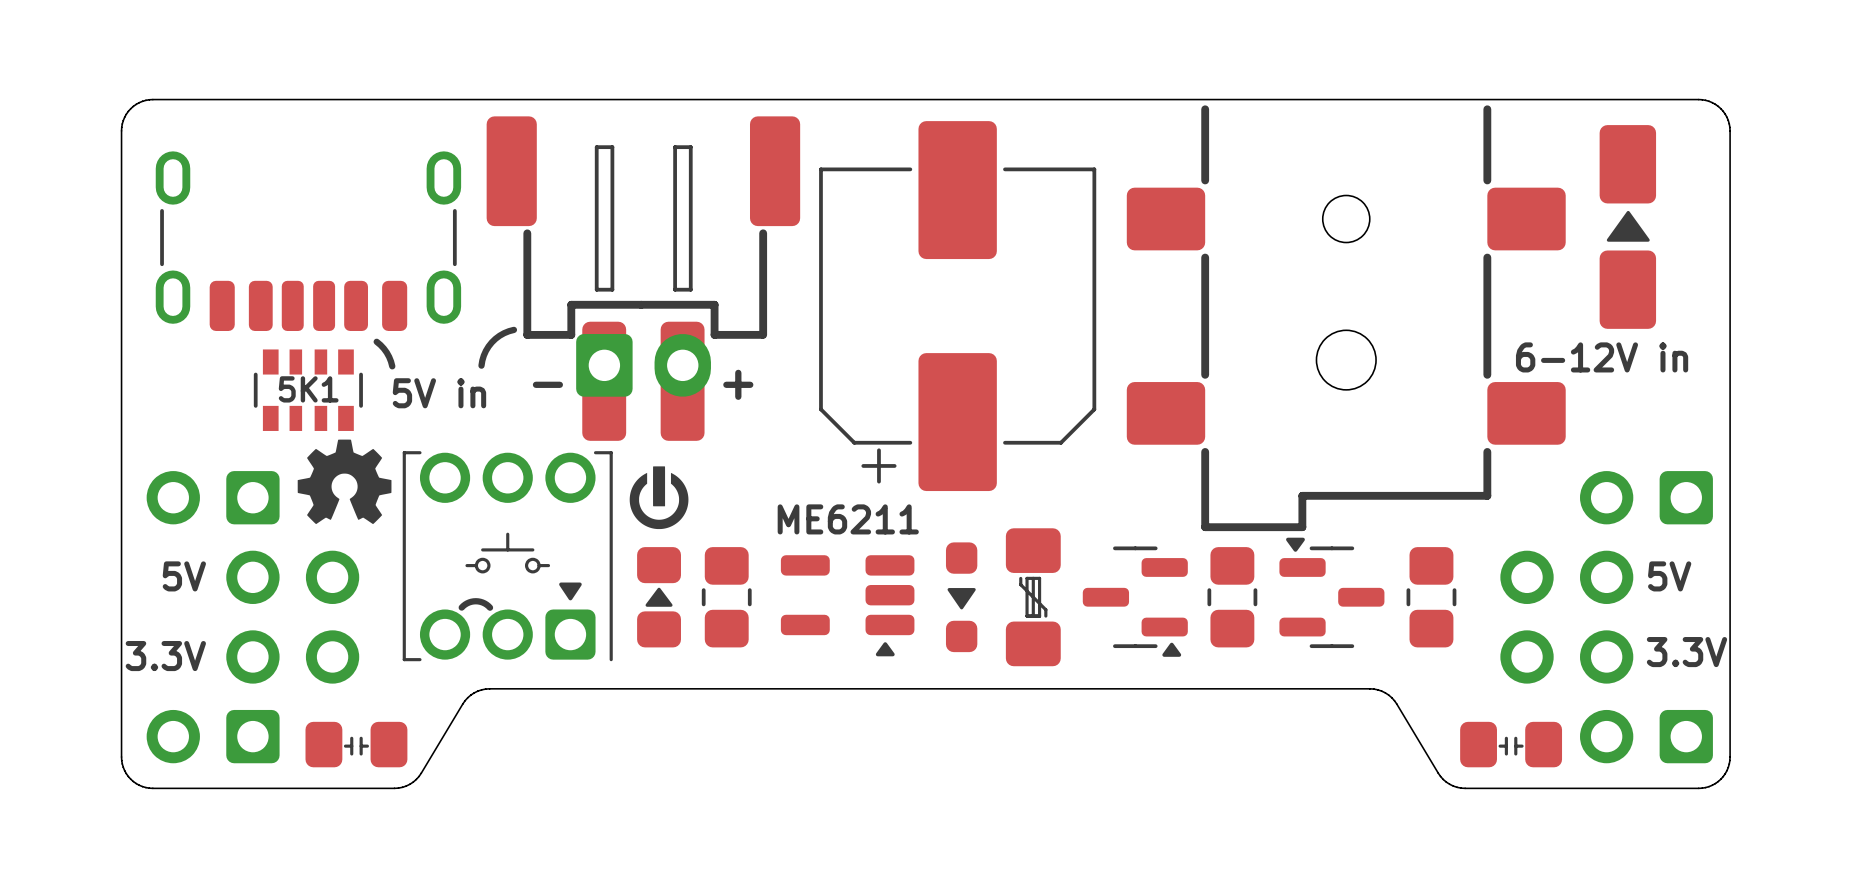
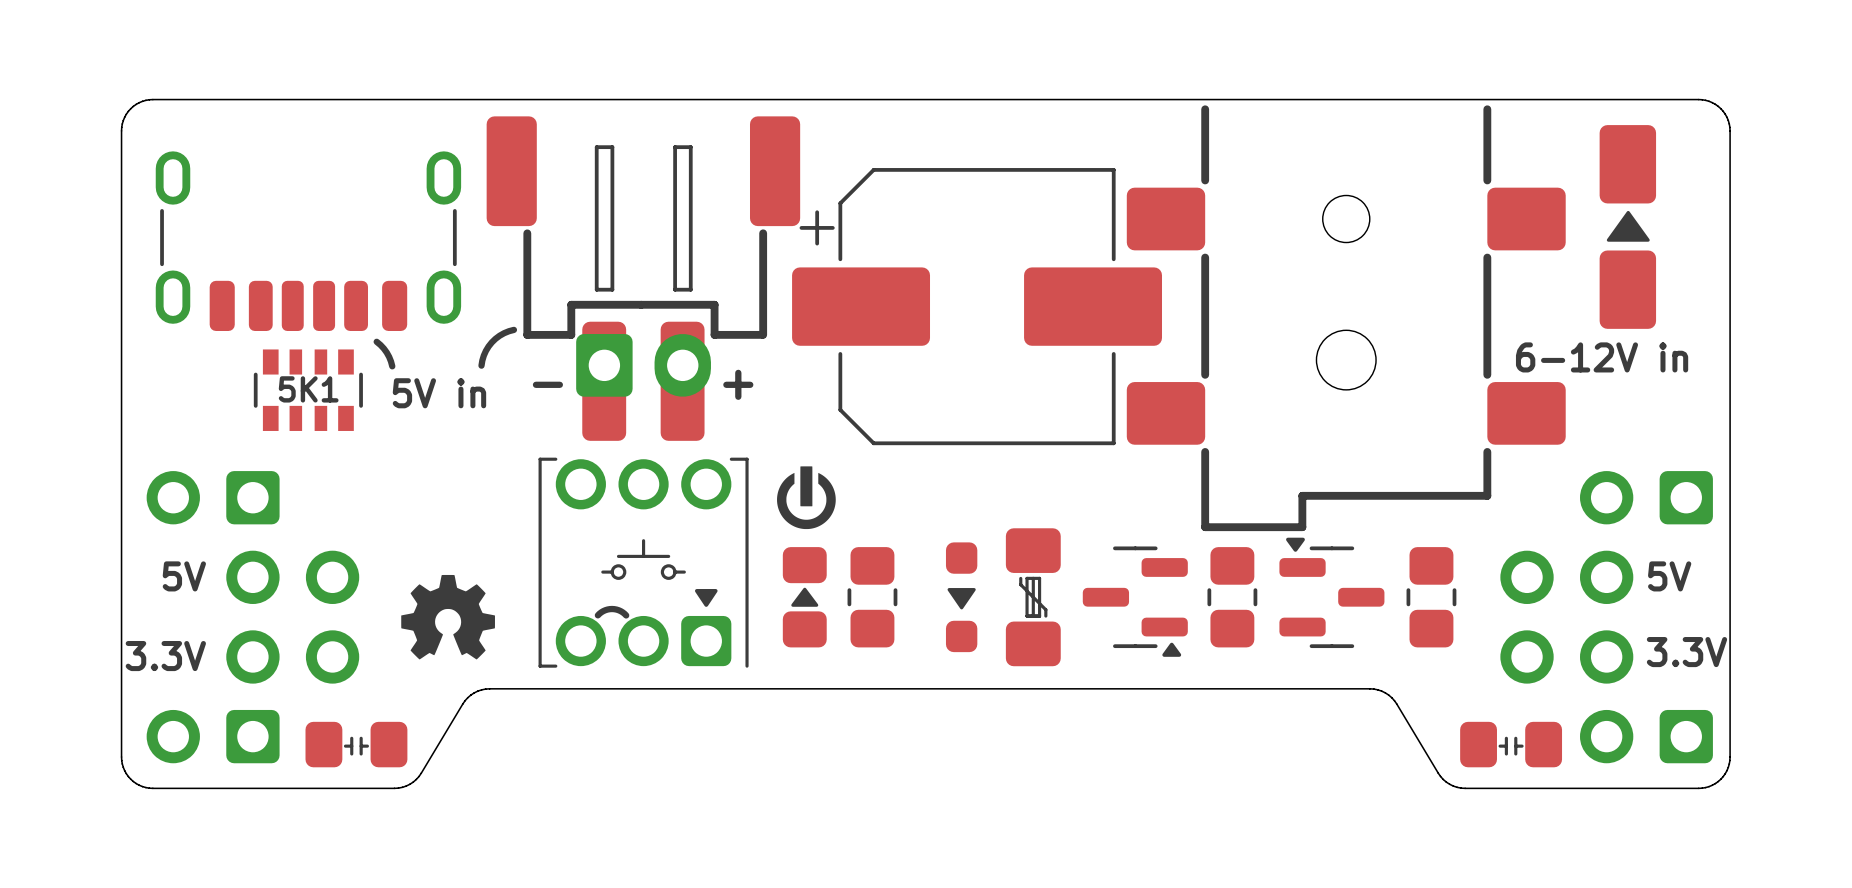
part rotation: 0° (957, 306) -> 90° clockwise (977, 306)
drawing position: (344, 481) -> (448, 617)
drawing position: (659, 497) -> (806, 497)
text: ME6211 (848, 519) -> none
part position: (507, 556) -> (643, 562)
part position: (659, 597) -> (804, 597)
part position: (726, 597) -> (872, 597)
part: (847, 605) -> none
line: (461, 607) (467, 603) (475, 601) (484, 603) (490, 607) -> (597, 615) (603, 611) (612, 609) (618, 610) (626, 615)

